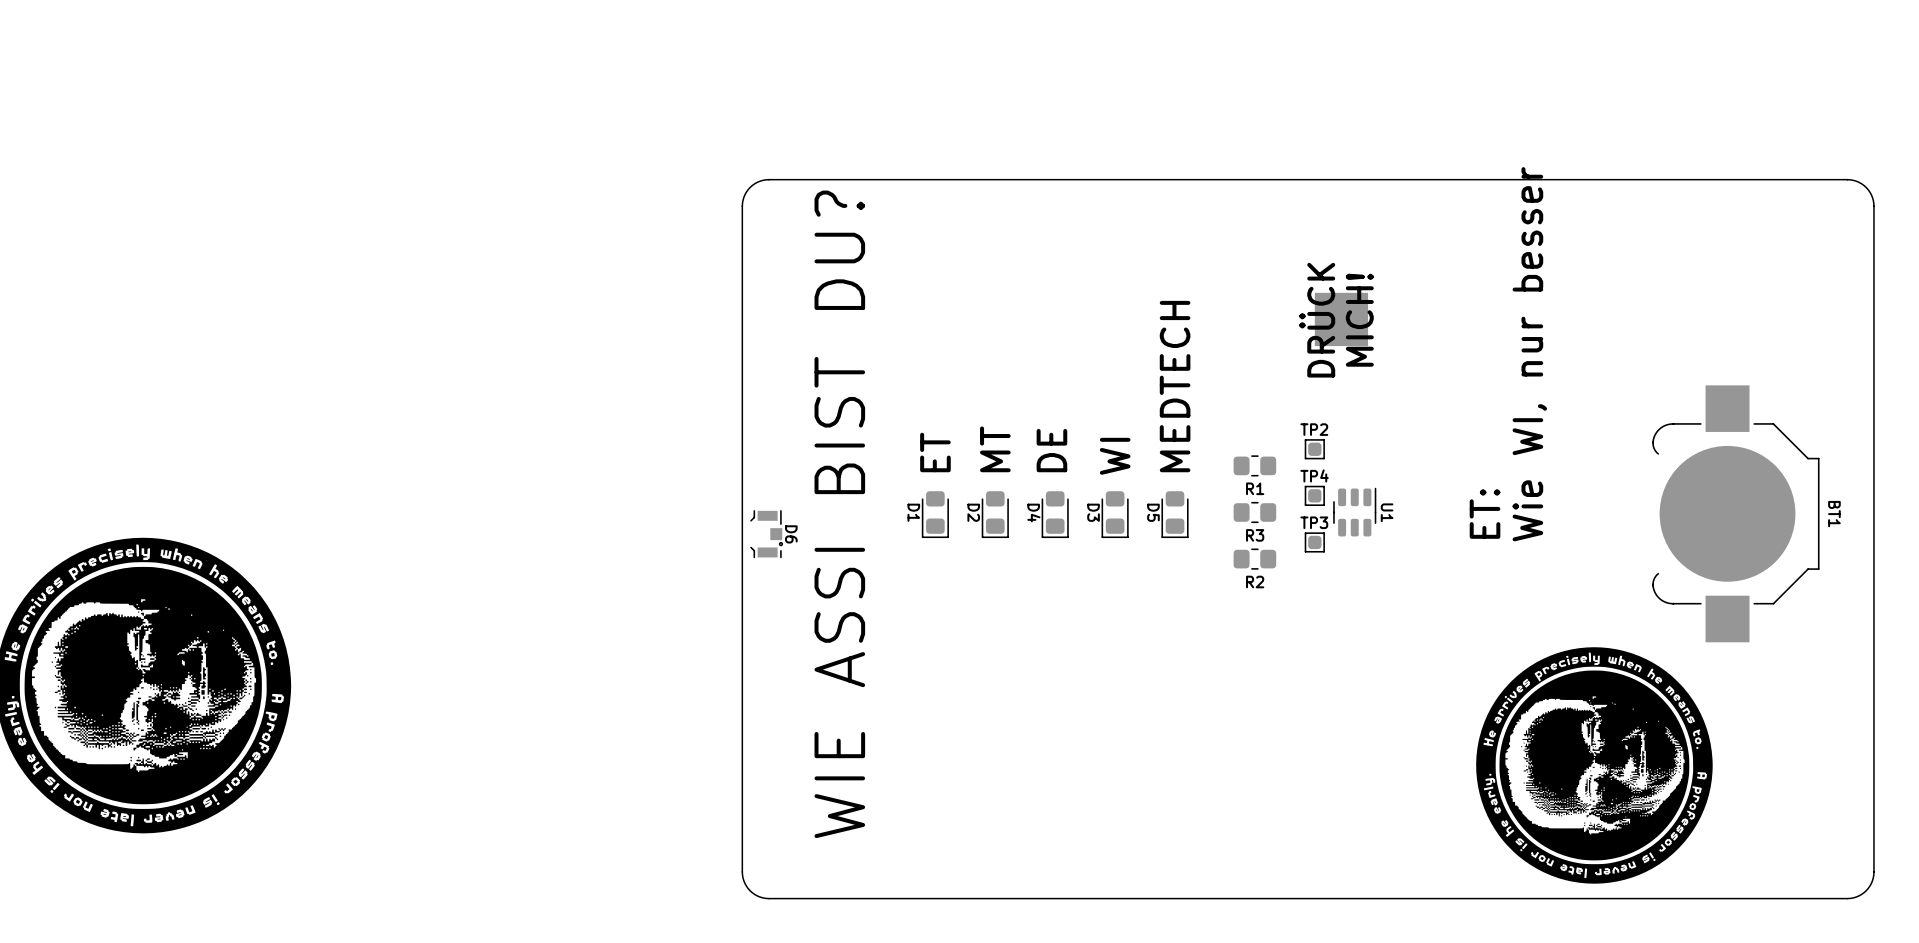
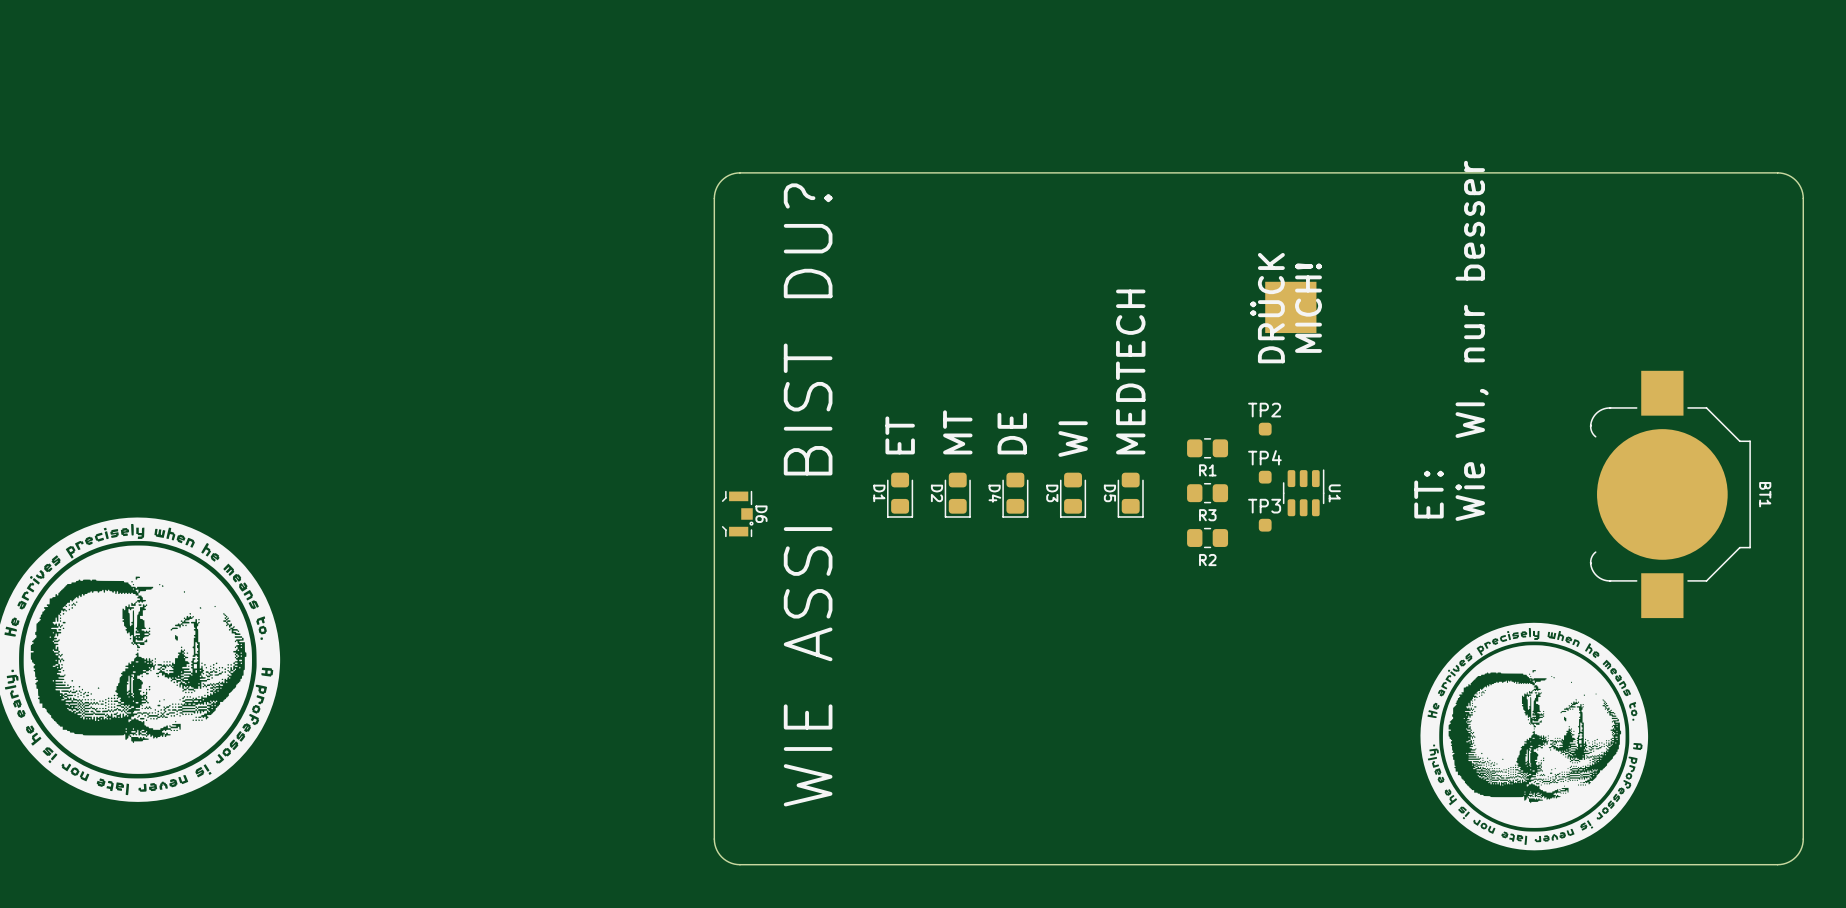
TP2 side: bottom (1314, 449) -> top (1265, 429)
TP4 side: bottom (1314, 495) -> top (1265, 477)
TP3 side: bottom (1314, 542) -> top (1265, 525)

